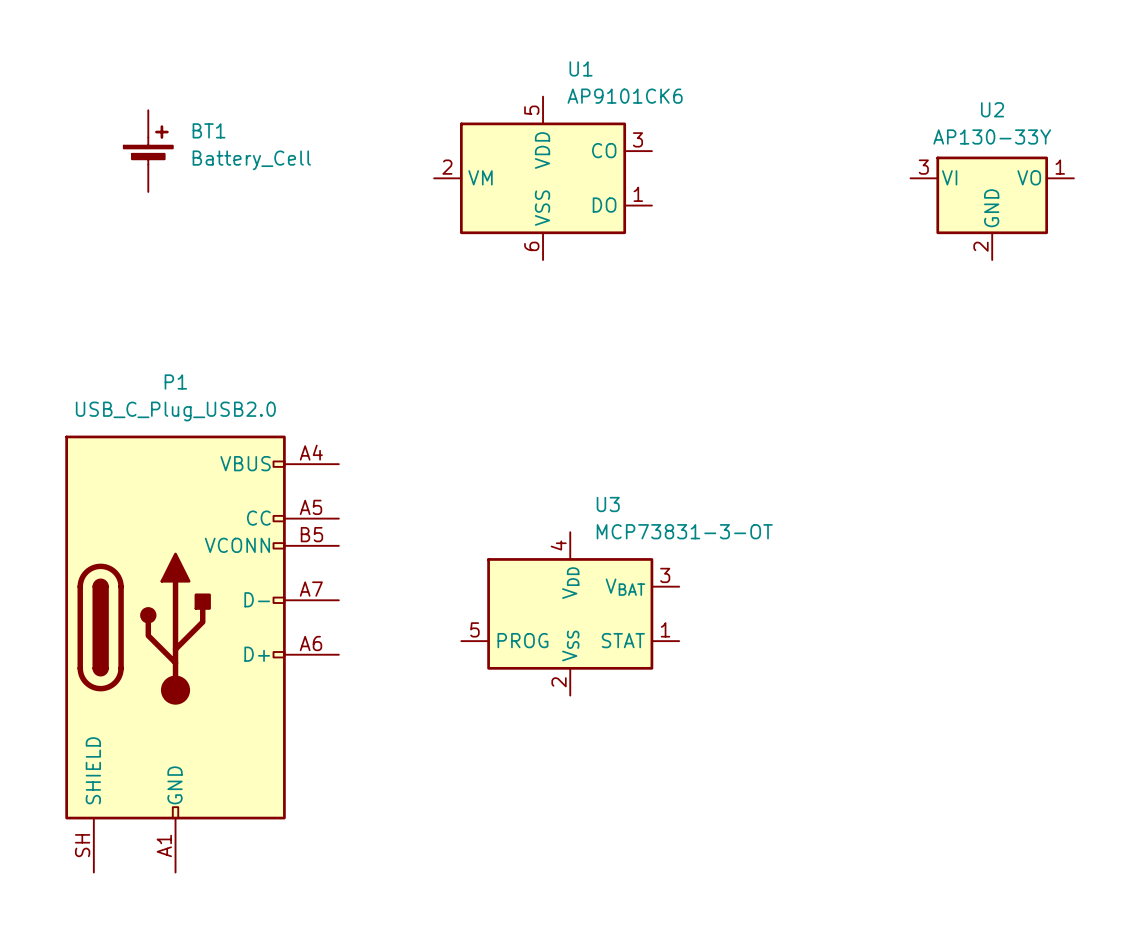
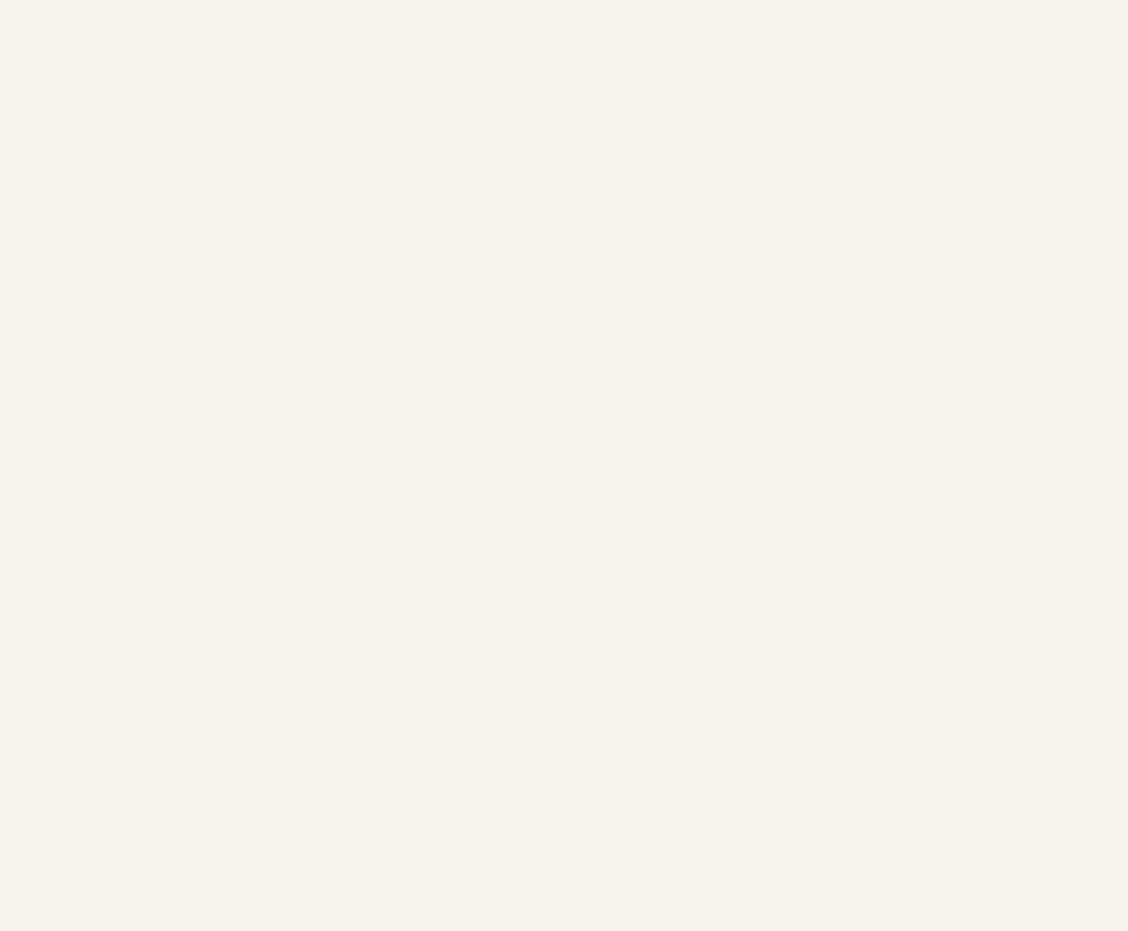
BT1: Battery_Cell (148, 151) -> none
U1: AP9101CK6 (543, 178) -> none
U2: AP130-33Y (992, 208) -> none
U3: MCP73831-3-OT (570, 613) -> none
P1: USB_C_Plug_USB2.0 (202, 654) -> none

